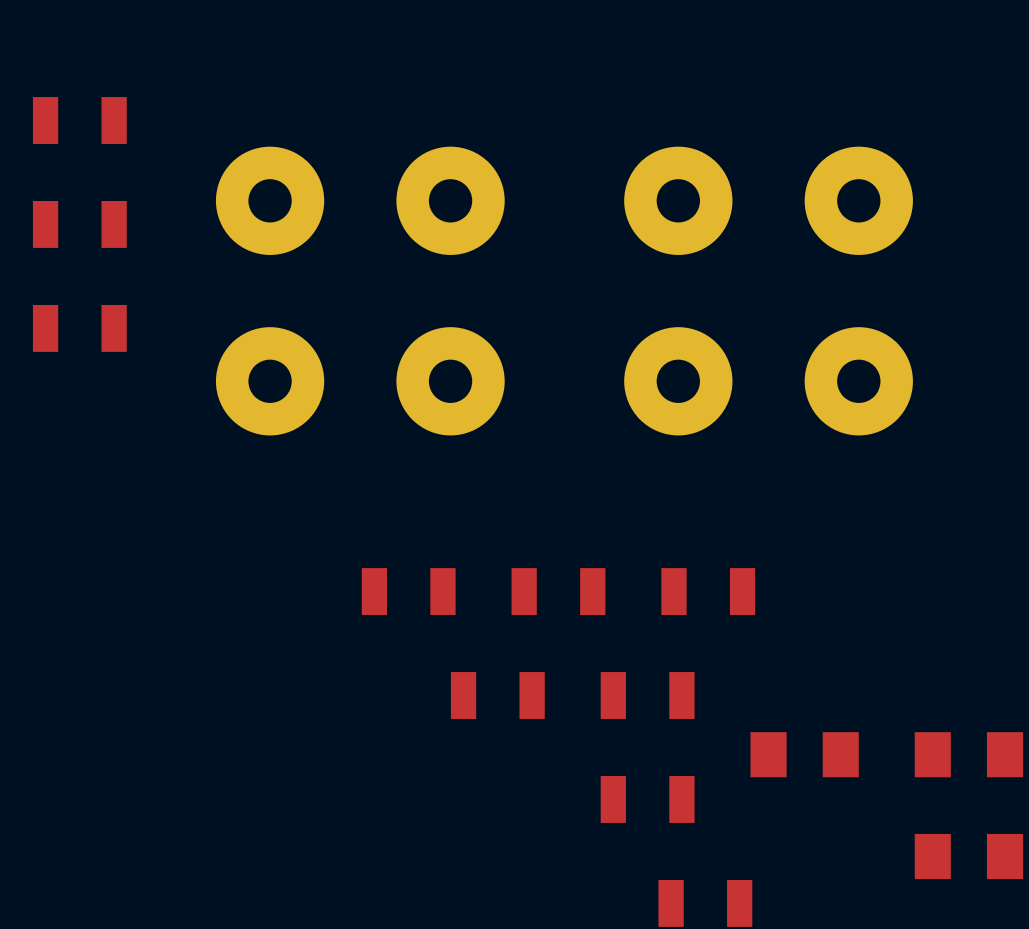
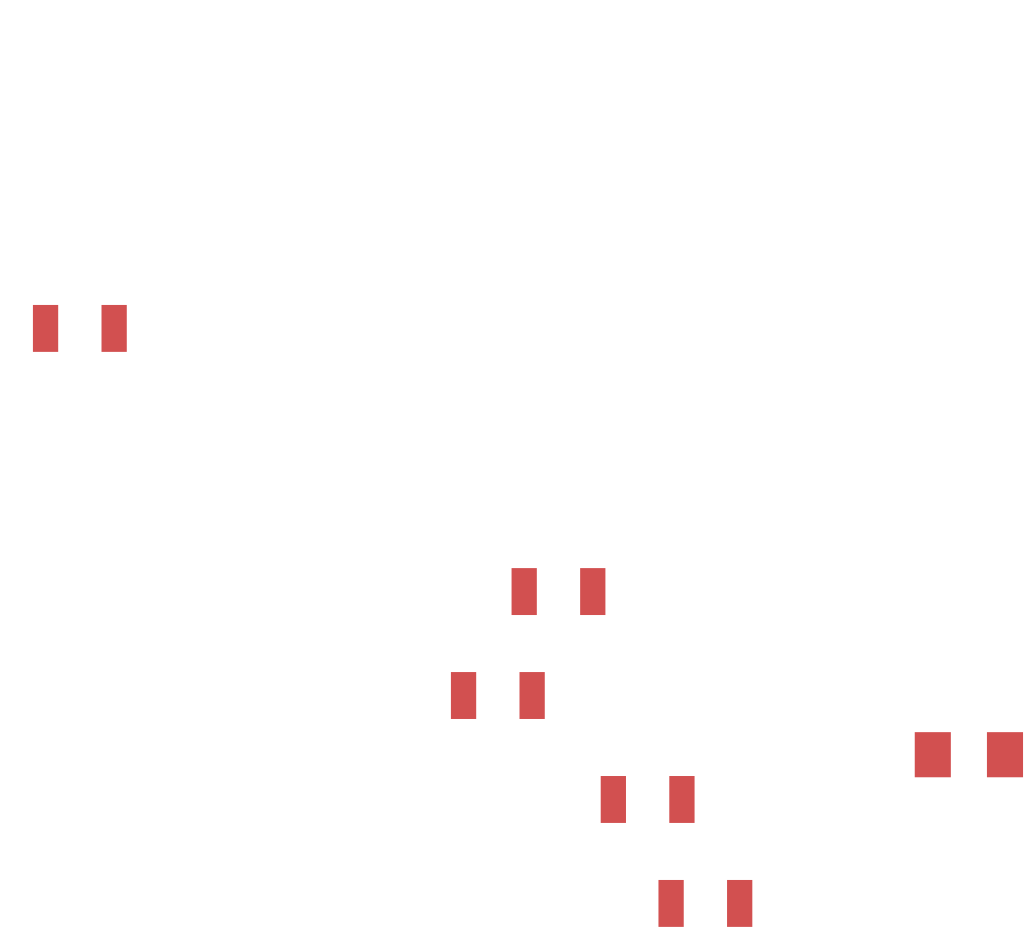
part: (79, 120) -> none
part: (79, 224) -> none
part: (360, 291) -> none
part: (768, 291) -> none
part: (408, 591) -> none
part: (708, 591) -> none
part: (647, 695) -> none
part: (804, 754) -> none
part: (968, 856) -> none

